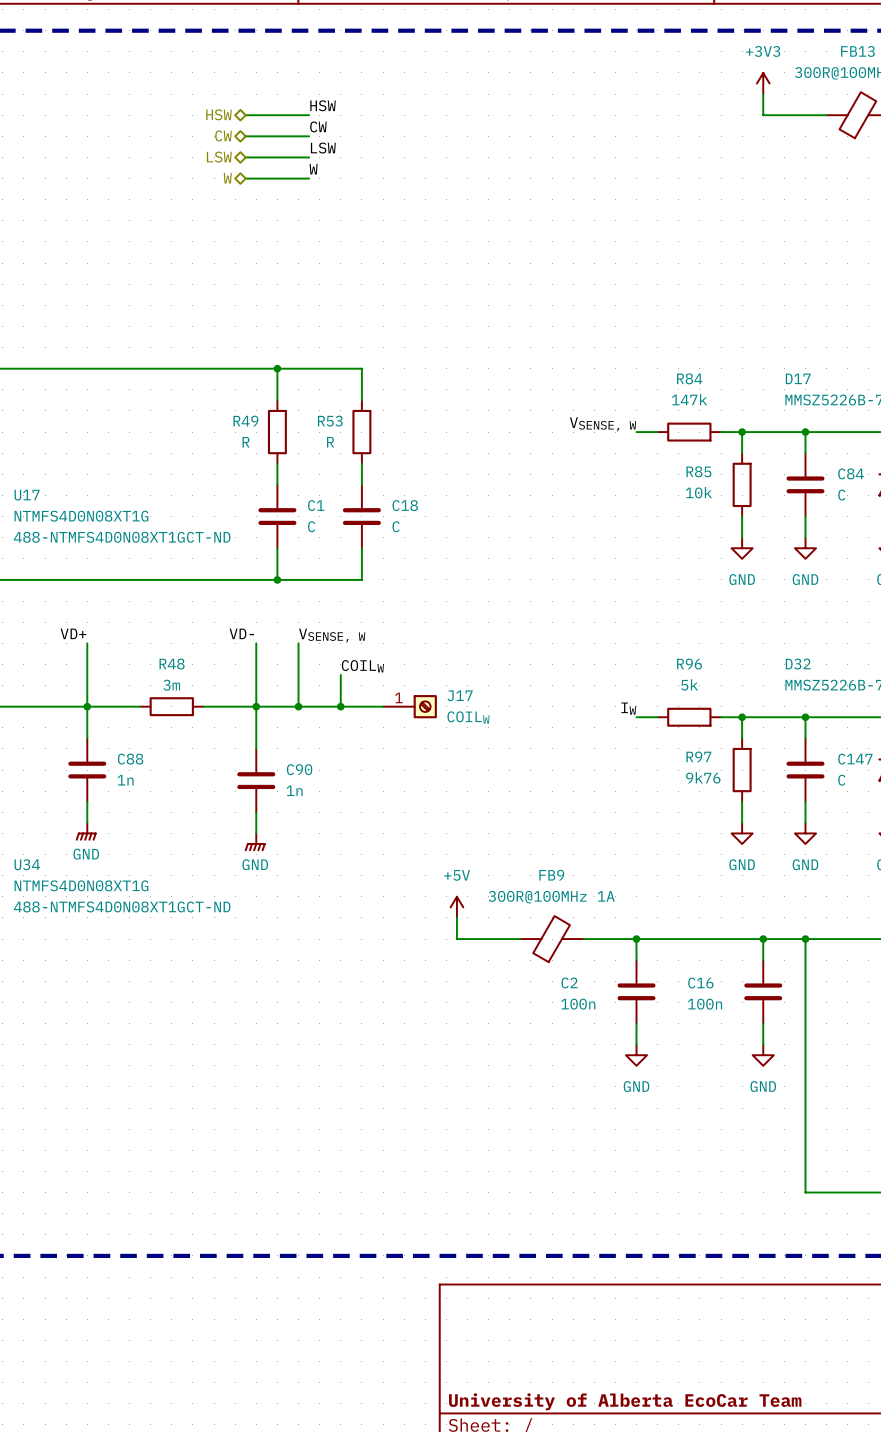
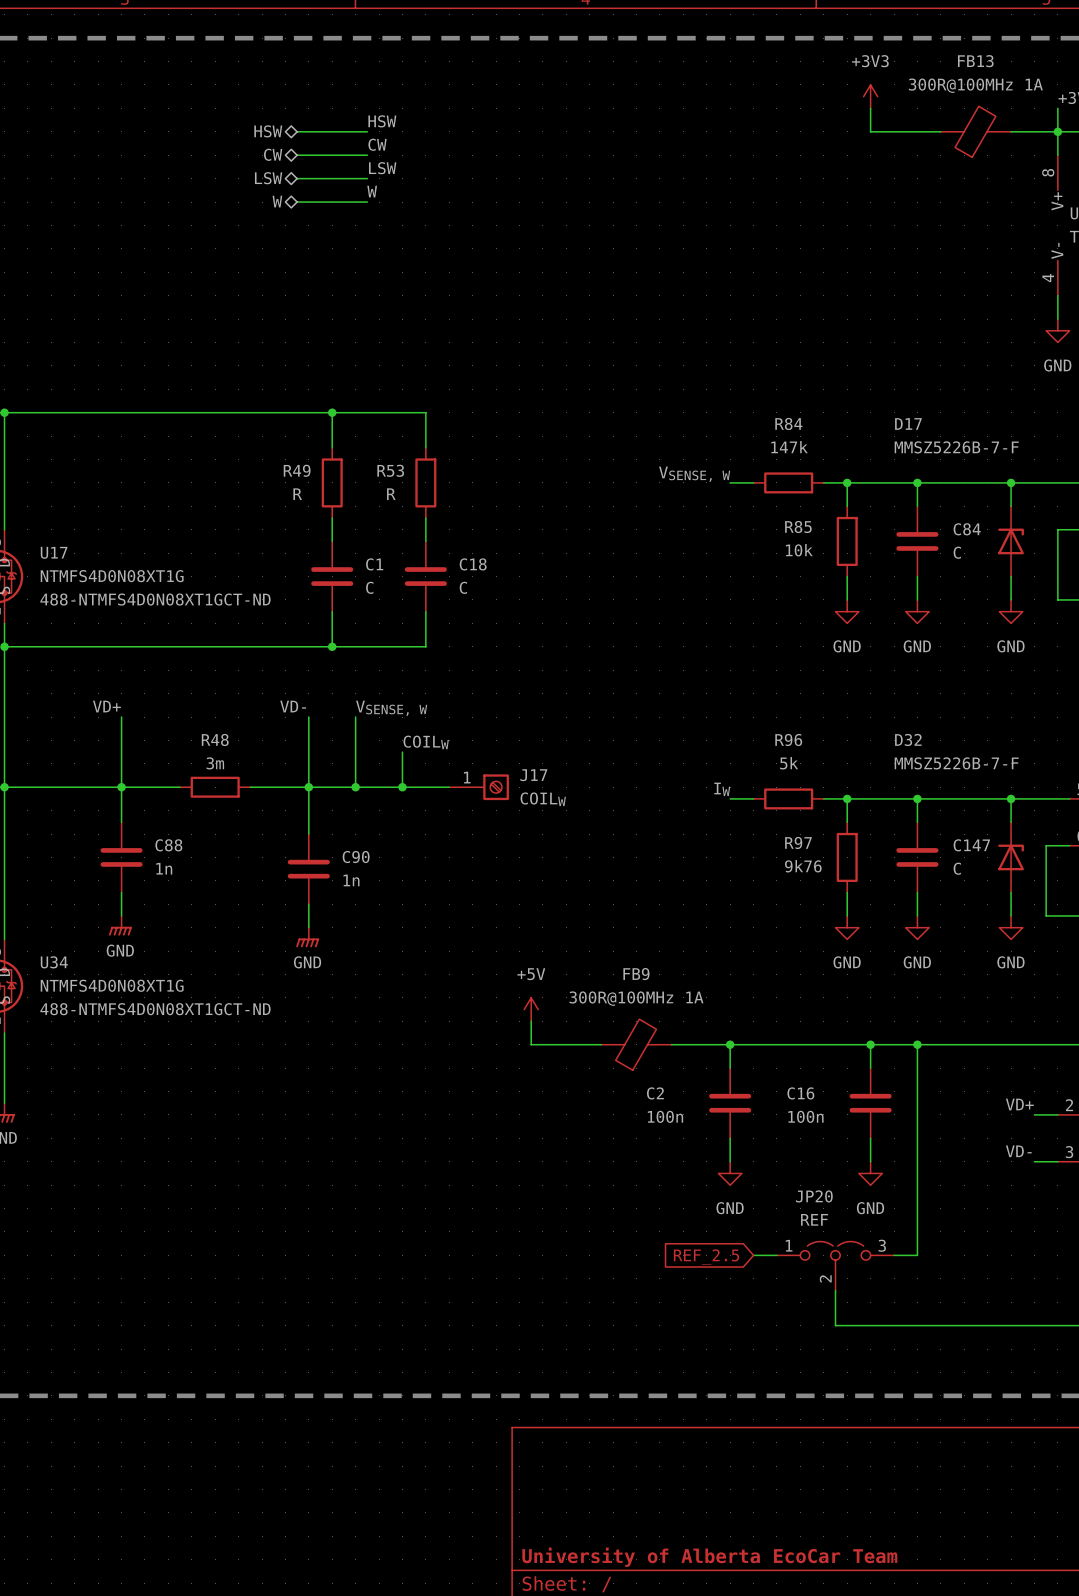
wire: none -> (753, 1255) (776, 1255)
wire: (805, 1129) (805, 1192) -> (917, 1255) (894, 1255)
global label: none -> REF_2.5 (706, 1257)
JP20: none -> REF (835, 1266)
wire: none -> (835, 1290) (835, 1325) (917, 1325)

